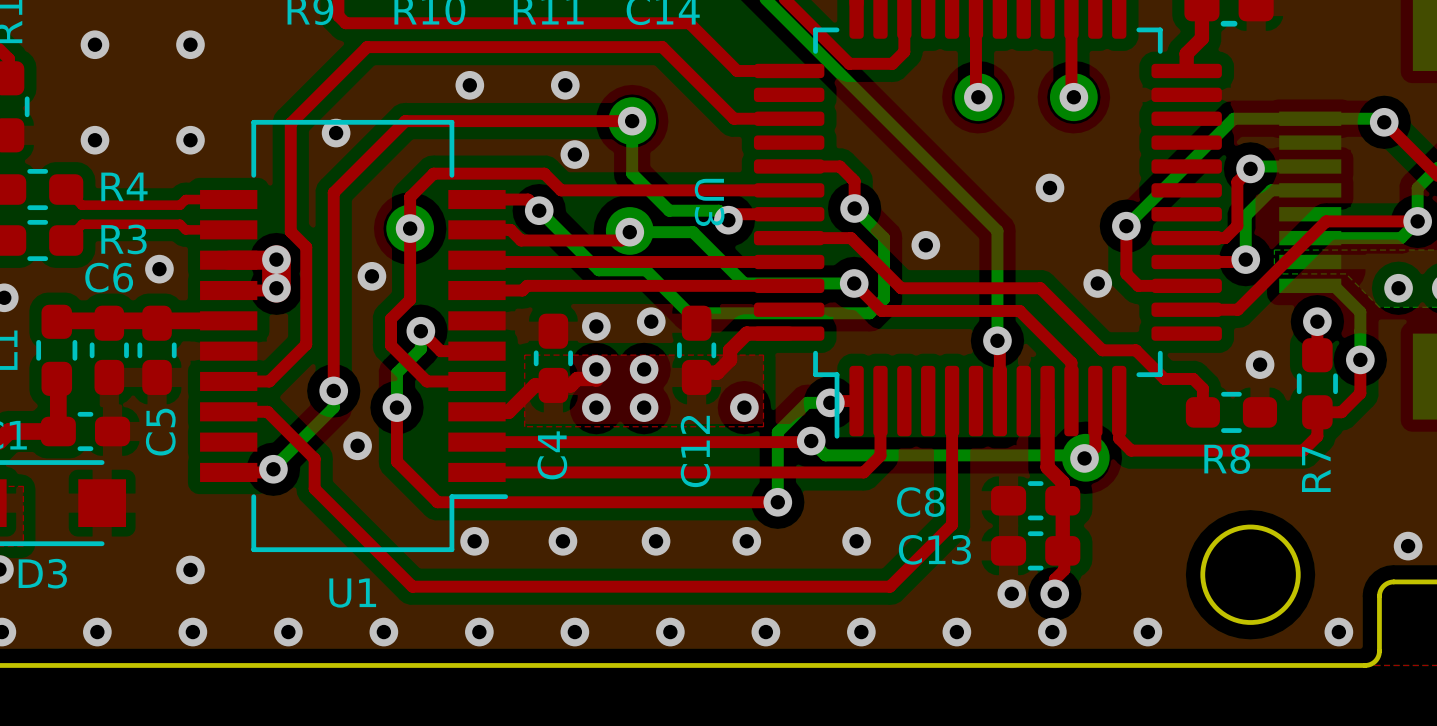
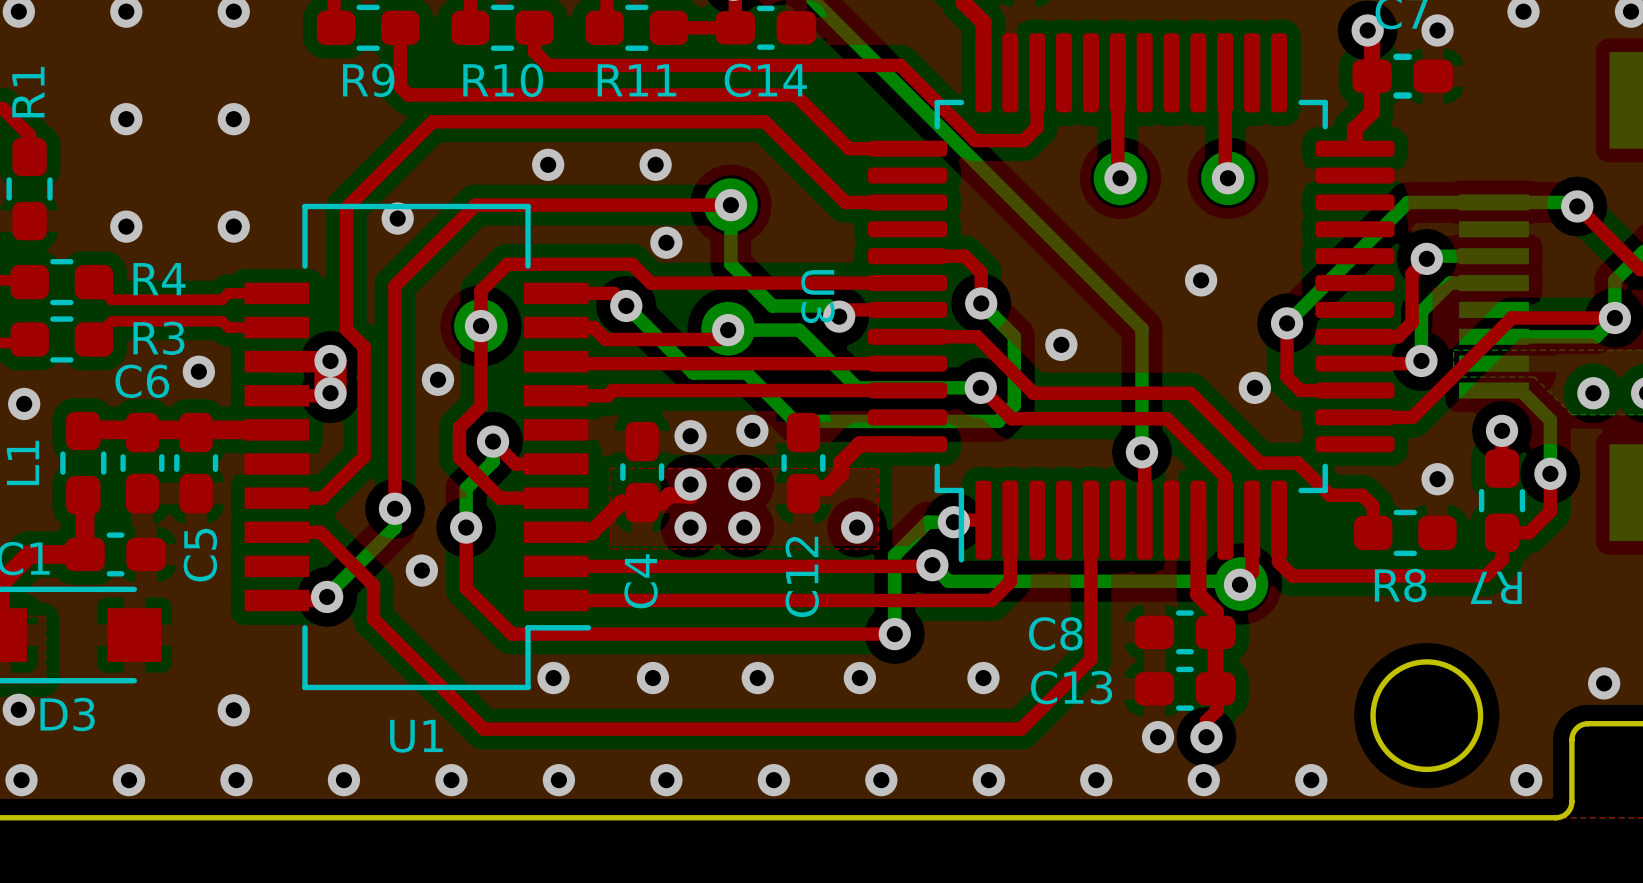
R7 name rotation: 0° (1316, 469) -> 90° counterclockwise (1496, 587)

